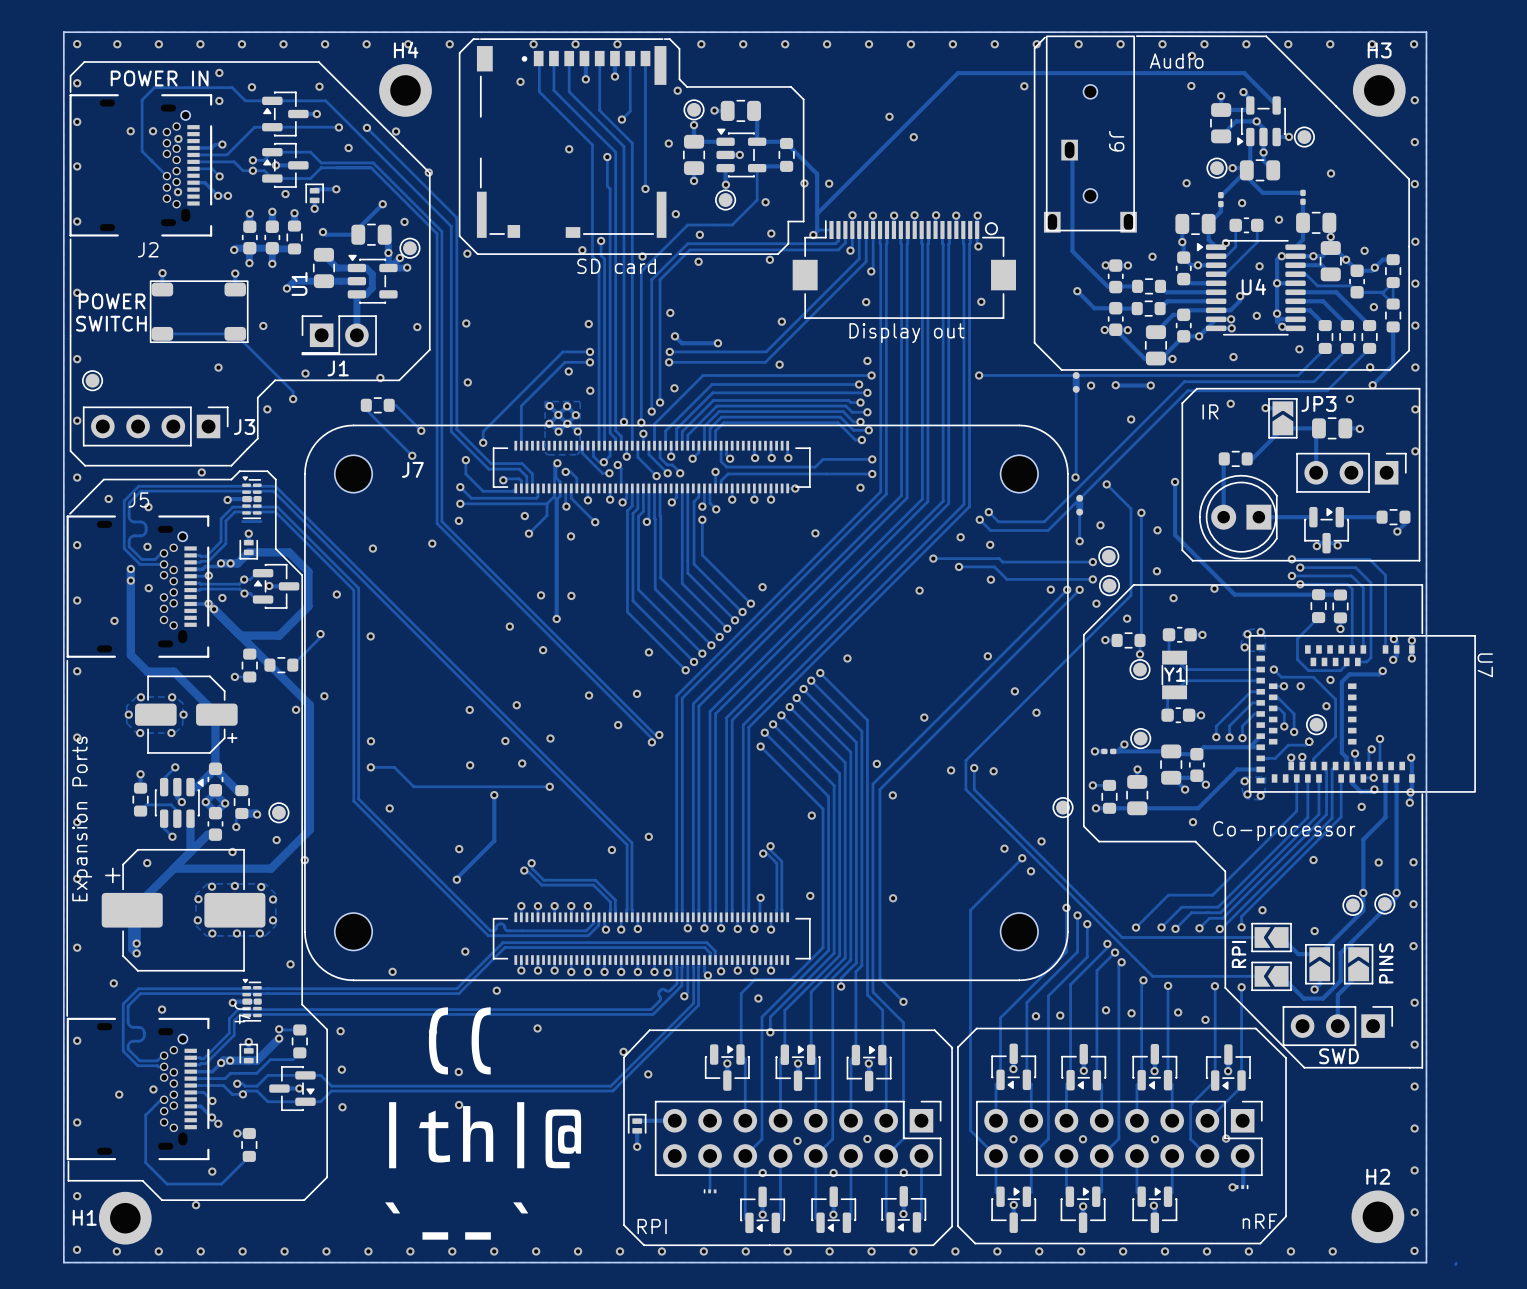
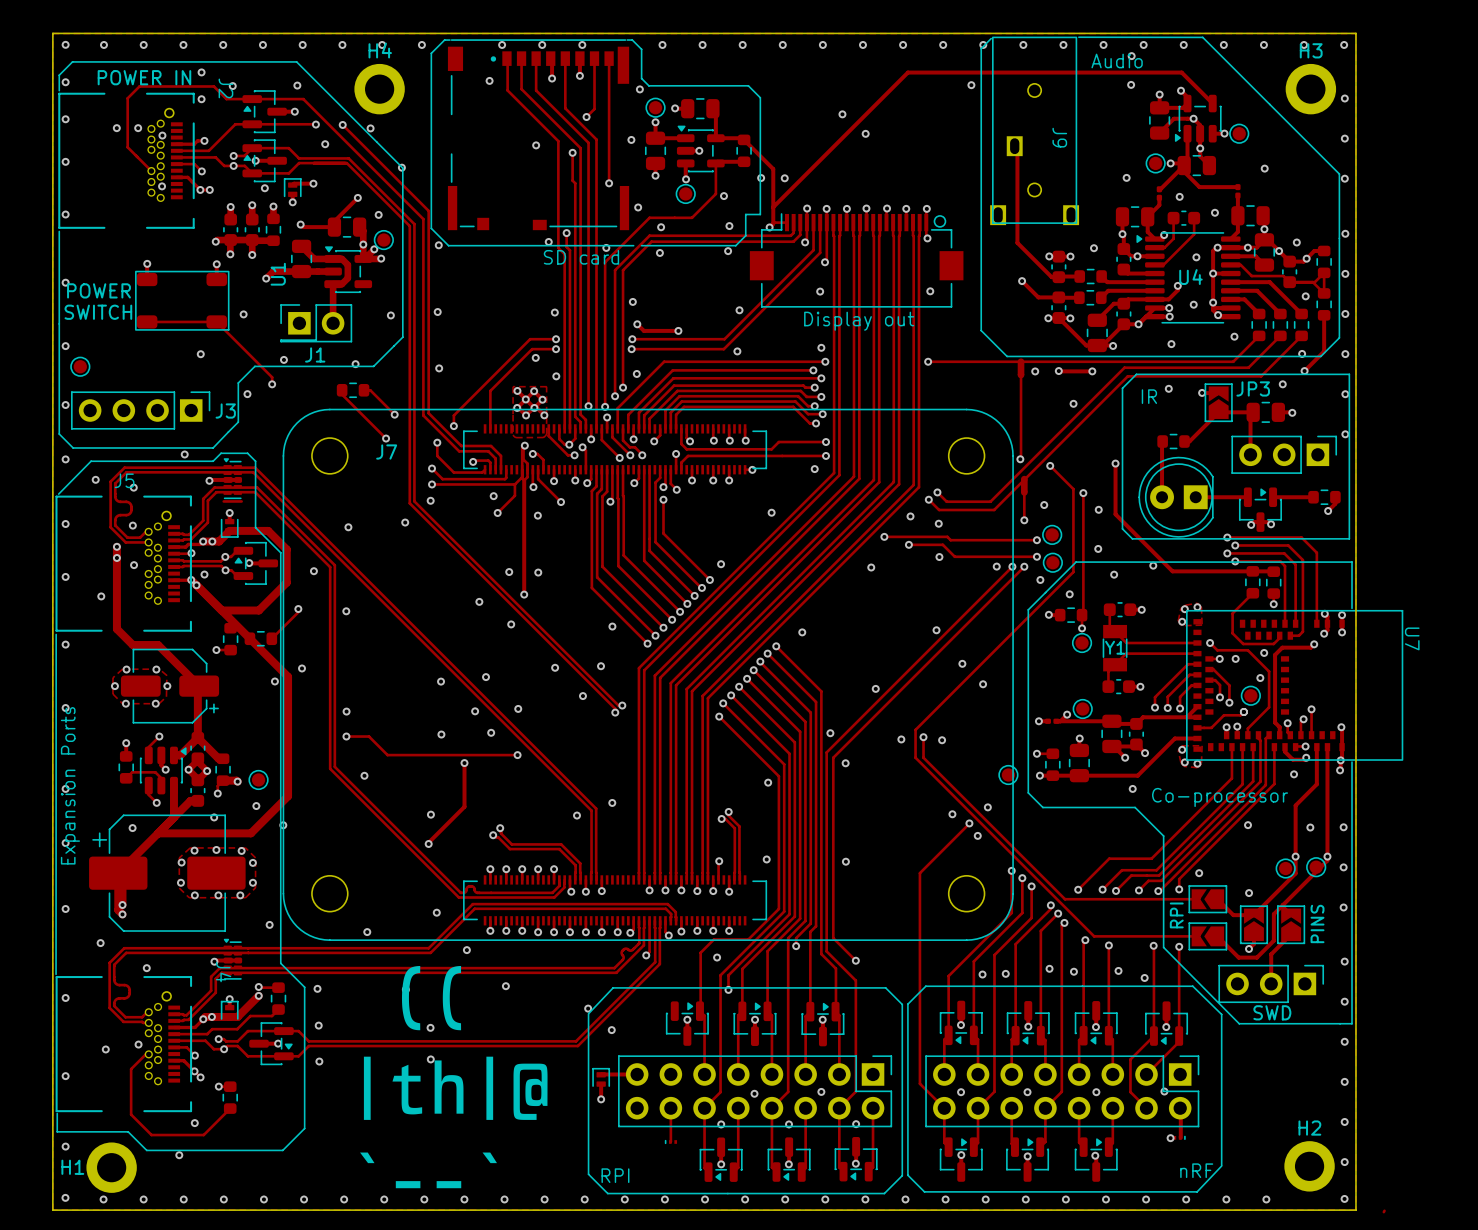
J2 name rotation: 0° (148, 249) -> 90° clockwise (225, 88)
J2 name position: J2 (148, 249) -> J2 (225, 88)

